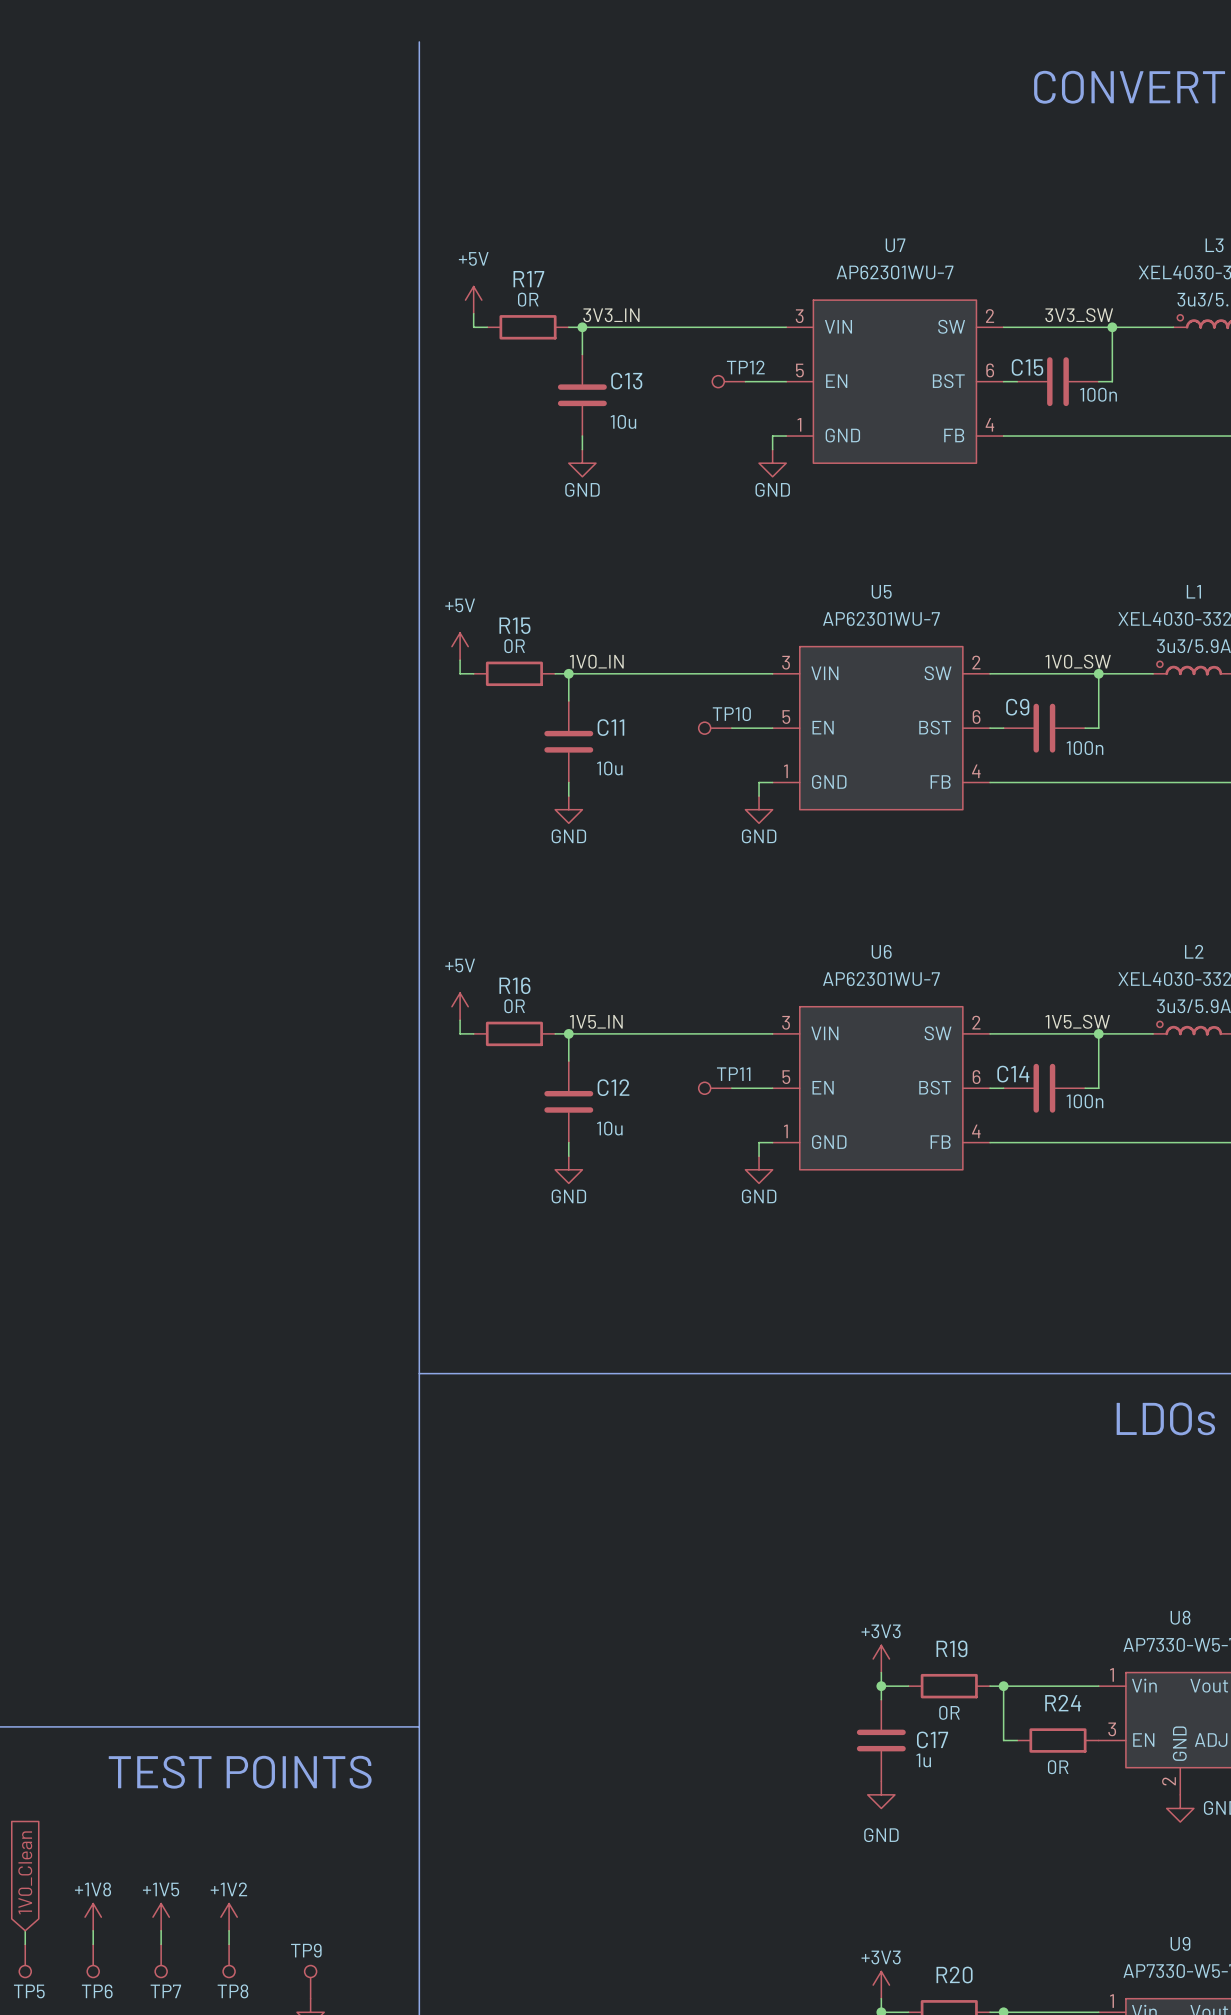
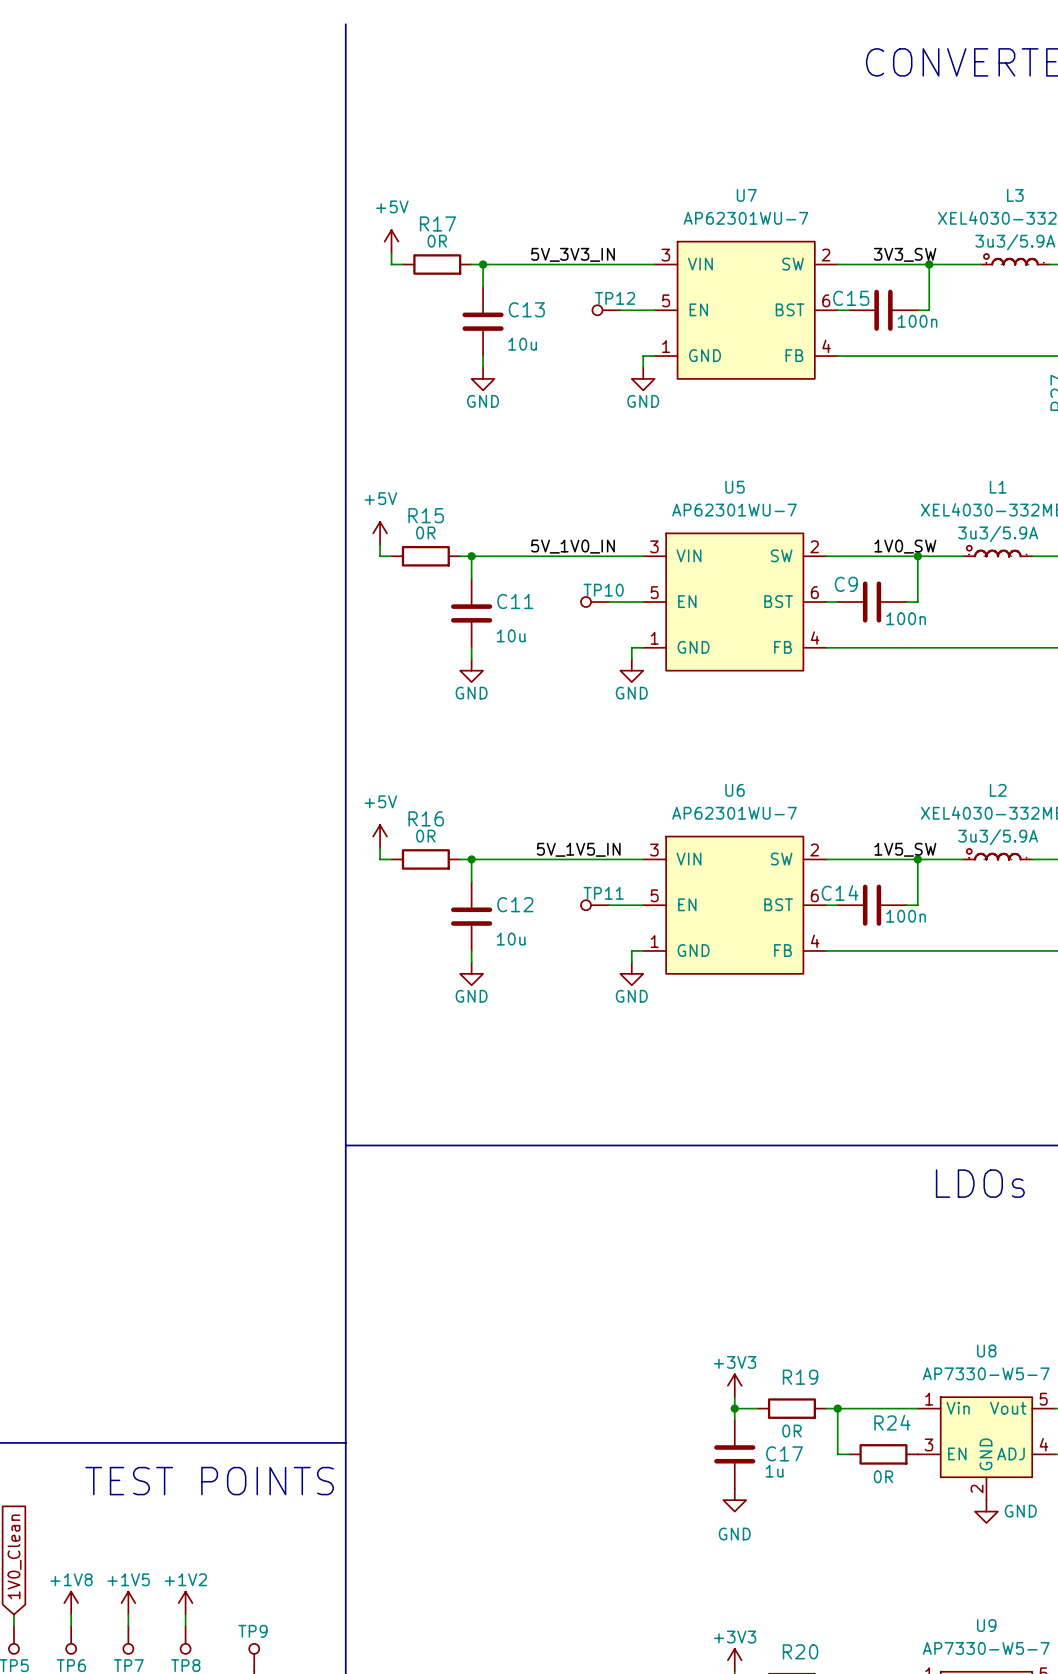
label: 3V3_IN (611, 315) -> 5V_3V3_IN (573, 254)
label: 1V0_IN (596, 661) -> 5V_1V0_IN (573, 546)
label: 1V5_IN (596, 1021) -> 5V_1V5_IN (578, 849)

